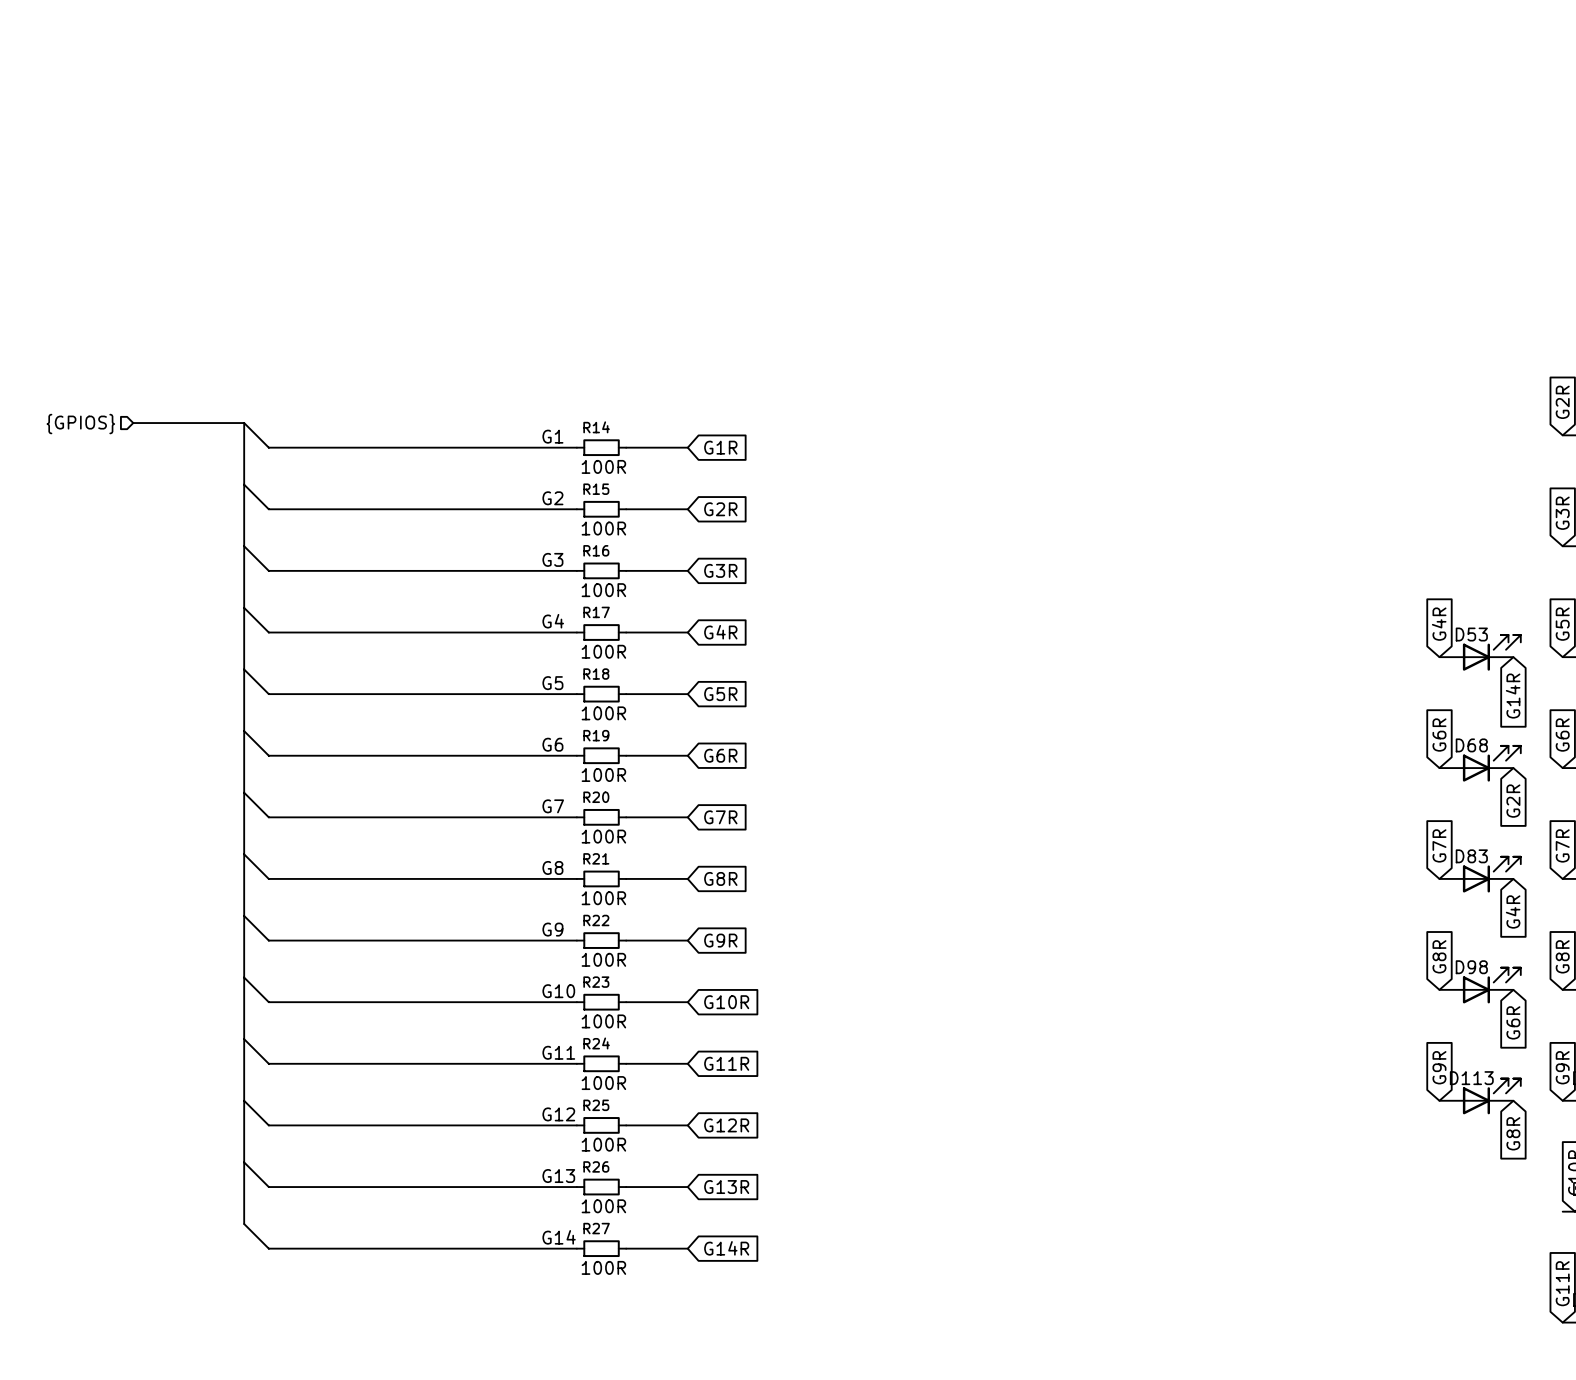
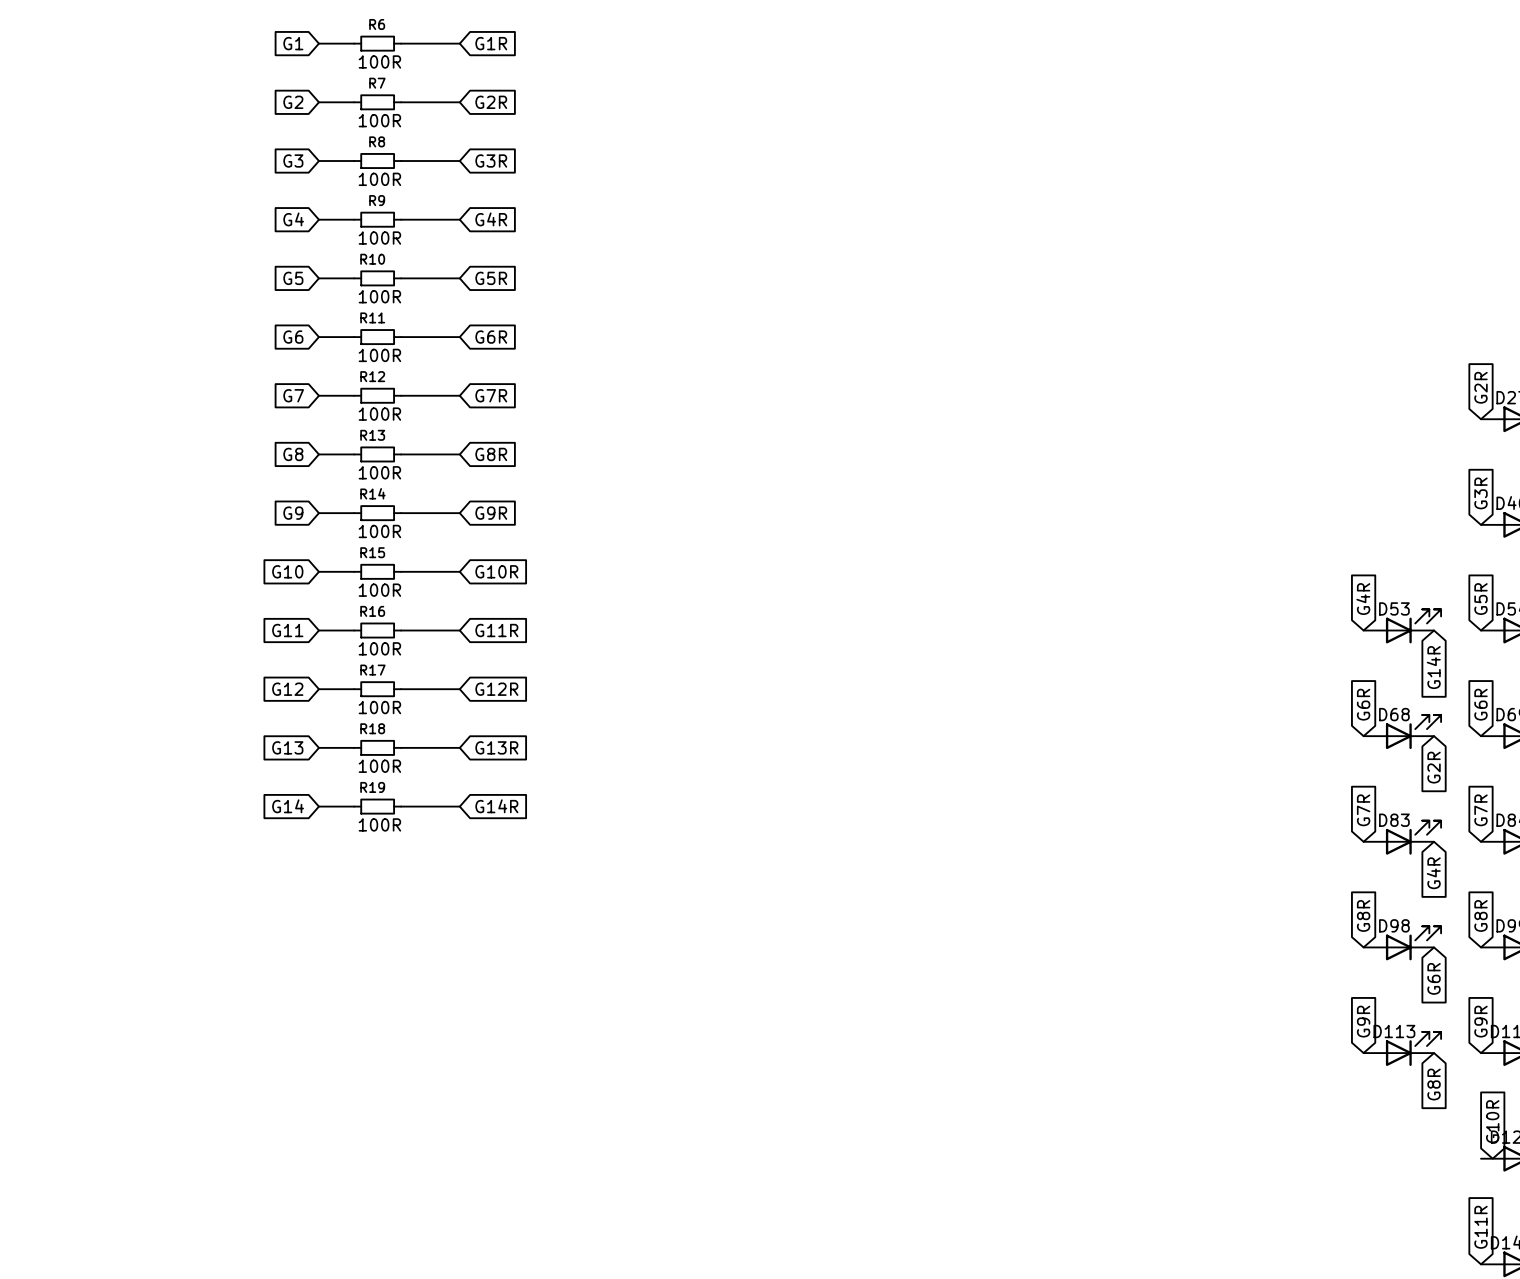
global label: none -> G1 (293, 43)
wire: none -> (318, 43) (354, 43)
R6: none -> 100R (377, 43)
wire: none -> (401, 43) (459, 43)
global label: none -> G1R (491, 43)
global label: none -> G2 (293, 102)
wire: none -> (318, 102) (354, 102)
R7: none -> 100R (377, 102)
wire: none -> (401, 102) (459, 102)
global label: none -> G2R (491, 102)
global label: none -> G3 (293, 161)
wire: none -> (318, 161) (354, 161)
R8: none -> 100R (377, 161)
wire: none -> (401, 161) (459, 161)
global label: none -> G3R (491, 161)
global label: none -> G4 (293, 219)
wire: none -> (318, 219) (354, 219)
R9: none -> 100R (377, 219)
wire: none -> (401, 219) (459, 219)
global label: none -> G4R (491, 219)
global label: none -> G5 (293, 278)
wire: none -> (318, 278) (354, 278)
R10: none -> 100R (377, 278)
wire: none -> (401, 278) (459, 278)
global label: none -> G5R (491, 278)
global label: none -> G6 (293, 337)
wire: none -> (318, 337) (354, 337)
R11: none -> 100R (377, 337)
global label: none -> G6R (491, 337)
global label: none -> G7 (293, 395)
wire: none -> (318, 395) (354, 395)
R12: none -> 100R (377, 395)
global label: none -> G7R (491, 395)
bus: (133, 423) (244, 423) (244, 1224) -> none
wire: (244, 423) (268, 447) (576, 447) -> none
hierarchical label: {GPIOS} (80, 424) -> none
label: G1 (552, 436) -> none
R14 position: (601, 447) -> (377, 513)
wire: (626, 447) (687, 447) -> (401, 337) (459, 337)
global label: G1R (720, 447) -> none
global label: none -> G8 (293, 454)
wire: none -> (318, 454) (354, 454)
R13: none -> 100R (377, 454)
global label: none -> G8R (491, 454)
wire: (244, 484) (268, 509) (576, 509) -> none
label: G2 (552, 498) -> none
R15 position: (601, 509) -> (377, 571)
wire: (626, 509) (687, 509) -> (401, 395) (459, 395)
global label: G2R (720, 509) -> none
global label: none -> G9 (293, 513)
wire: none -> (318, 513) (354, 513)
global label: none -> G9R (491, 513)
wire: (244, 546) (268, 570) (576, 570) -> none
label: G3 (552, 559) -> none
R16 position: (601, 570) -> (377, 630)
wire: (626, 570) (687, 570) -> (401, 454) (459, 454)
global label: G3R (720, 570) -> none
global label: none -> G10 (287, 571)
wire: none -> (318, 571) (354, 571)
global label: none -> G10R (496, 571)
wire: (244, 607) (268, 632) (576, 632) -> none
label: G4 (553, 621) -> none
R17 position: (601, 632) -> (377, 689)
wire: (626, 632) (687, 632) -> (401, 513) (459, 513)
global label: G4R (720, 632) -> none
global label: none -> G11 (287, 630)
wire: none -> (318, 630) (354, 630)
global label: none -> G11R (496, 630)
wire: (244, 669) (268, 694) (576, 694) -> none
label: G5 (552, 683) -> none
R18 position: (601, 694) -> (377, 747)
wire: (626, 694) (687, 694) -> (401, 571) (459, 571)
global label: G5R (720, 694) -> none
global label: none -> G12 (287, 689)
wire: none -> (318, 689) (354, 689)
global label: none -> G12R (496, 689)
wire: (244, 731) (268, 755) (576, 755) -> none
label: G6 (552, 744) -> none
R19 position: (601, 755) -> (377, 806)
wire: (626, 755) (687, 755) -> (401, 630) (459, 630)
global label: G6R (720, 755) -> none
global label: none -> G13 (287, 747)
wire: none -> (318, 747) (354, 747)
global label: none -> G13R (496, 747)
wire: (244, 792) (268, 817) (576, 817) -> none
label: G7 (553, 806) -> none
R20: 100R (601, 817) -> none
wire: (626, 817) (687, 817) -> (401, 689) (459, 689)
global label: G7R (720, 817) -> none
global label: none -> G14 (288, 806)
wire: none -> (318, 806) (354, 806)
global label: none -> G14R (496, 806)
wire: (244, 854) (268, 878) (576, 878) -> none
label: G8 (552, 867) -> none
R21: 100R (601, 878) -> none
wire: (626, 878) (687, 878) -> (401, 747) (459, 747)
global label: G8R (720, 878) -> none
wire: (244, 915) (268, 940) (576, 940) -> none
label: G9 (552, 929) -> none
R22: 100R (601, 940) -> none
wire: (626, 940) (687, 940) -> (401, 806) (459, 806)
global label: G9R (720, 940) -> none
wire: (244, 977) (268, 1002) (576, 1002) -> none
label: G10 (558, 991) -> none
R23: 100R (601, 1002) -> none
wire: (626, 1002) (687, 1002) -> none
global label: G10R (726, 1002) -> none
wire: (244, 1039) (268, 1063) (576, 1063) -> none
label: G11 (558, 1052) -> none
R24: 100R (601, 1063) -> none
wire: (626, 1063) (687, 1063) -> none
global label: G11R (726, 1063) -> none
wire: (244, 1100) (268, 1125) (576, 1125) -> none
label: G12 (558, 1114) -> none
R25: 100R (601, 1125) -> none
wire: (626, 1125) (687, 1125) -> none
global label: G12R (726, 1125) -> none
wire: (244, 1162) (268, 1187) (576, 1187) -> none
label: G13 (558, 1176) -> none
R26: 100R (601, 1187) -> none
wire: (626, 1187) (687, 1187) -> none
global label: G13R (726, 1187) -> none
wire: (244, 1224) (268, 1248) (576, 1248) -> none
label: G14 (559, 1237) -> none
R27: 100R (601, 1248) -> none
wire: (626, 1248) (687, 1248) -> none
global label: G14R (726, 1248) -> none

